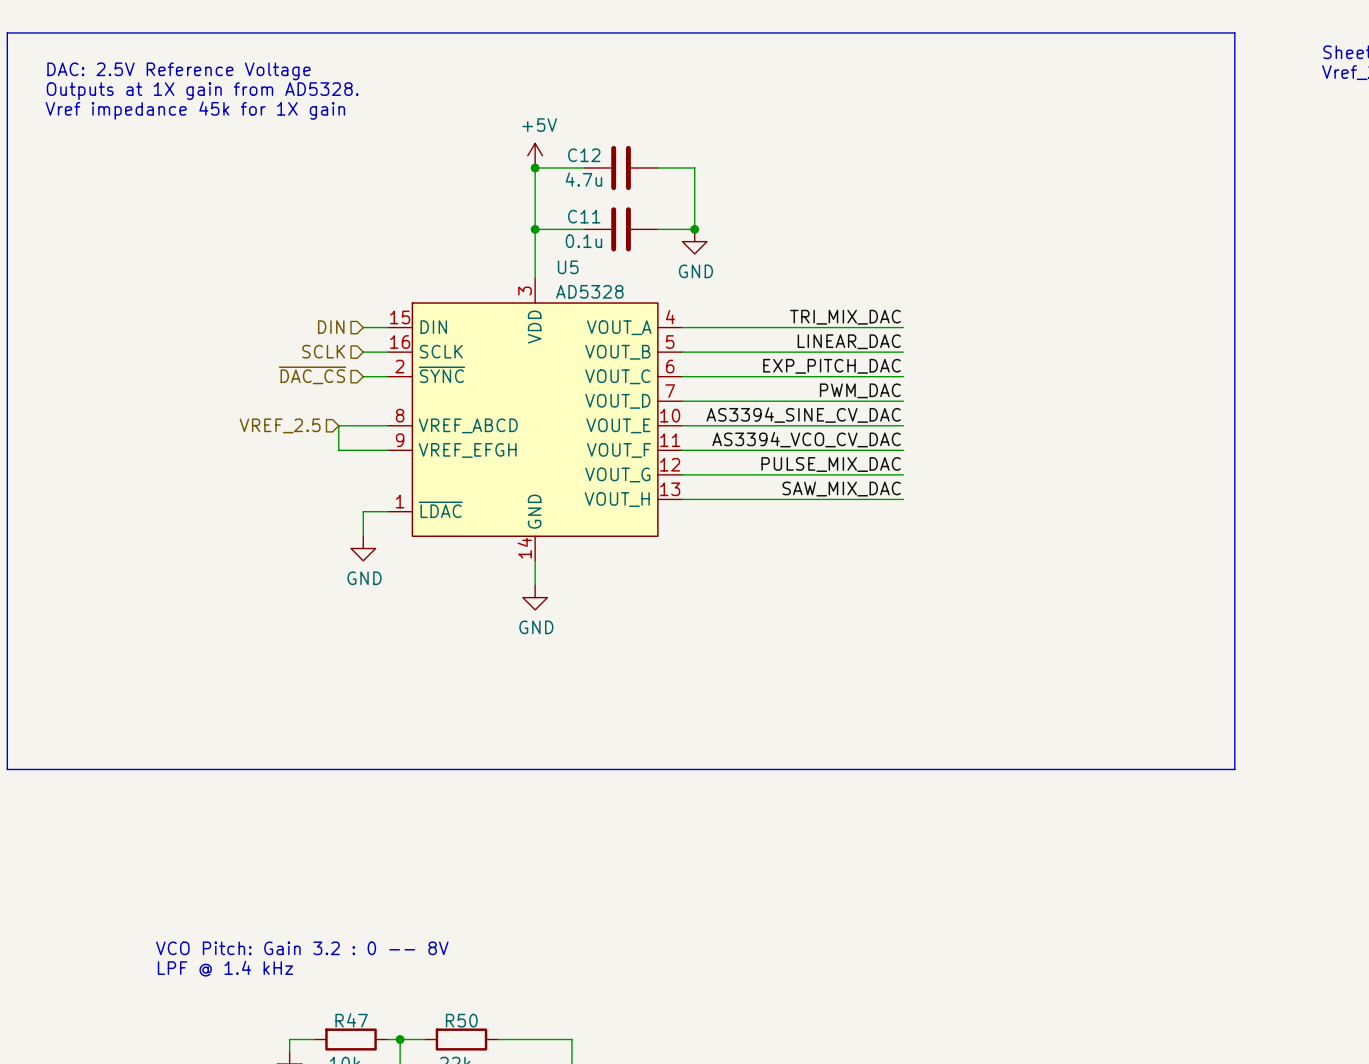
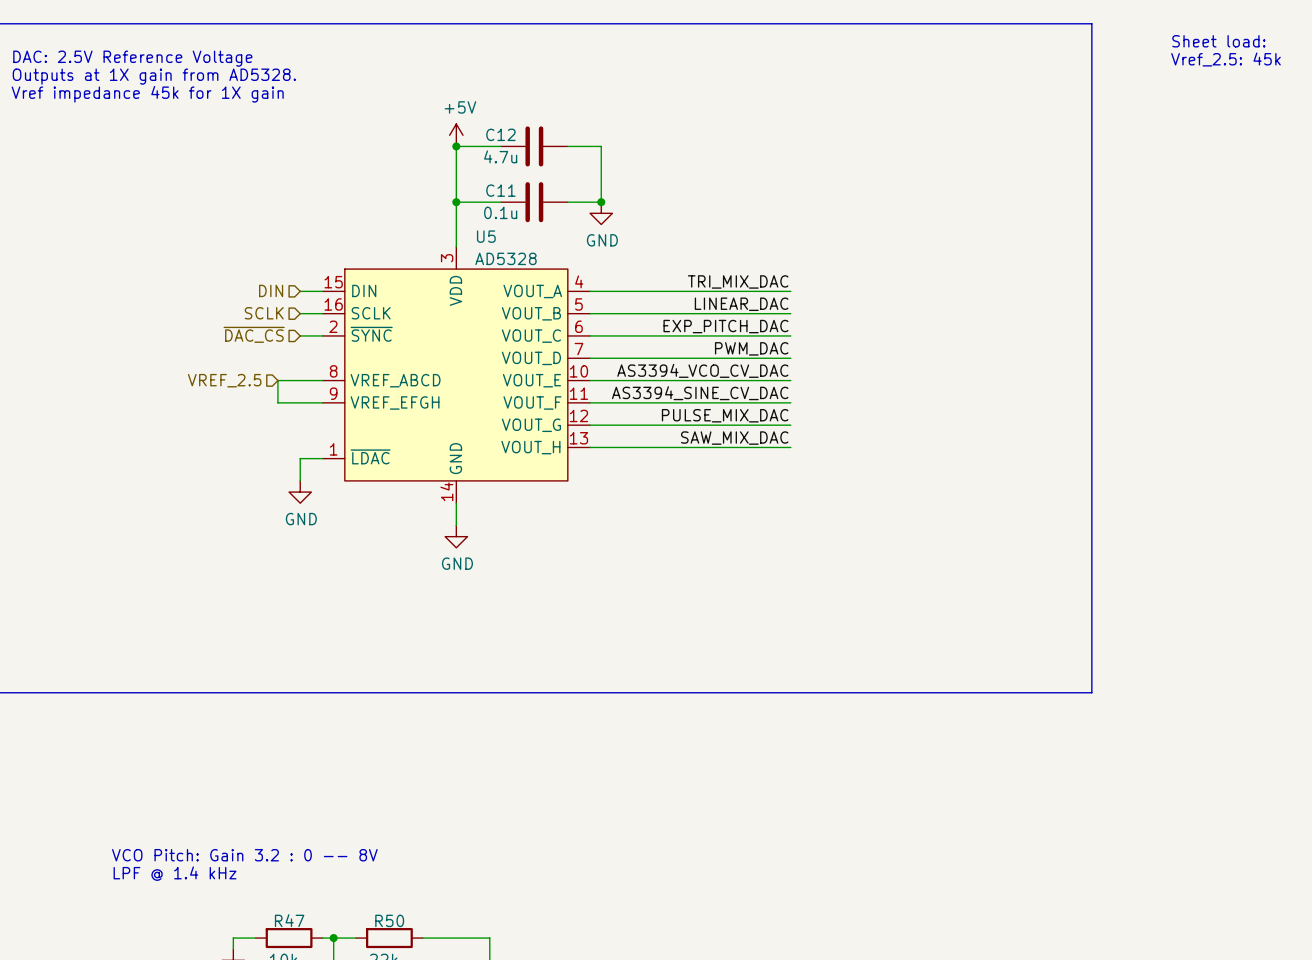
label: AS3394_SINE_CV_DAC (803, 415) -> AS3394_VCO_CV_DAC (702, 370)
label: AS3394_VCO_CV_DAC (806, 439) -> AS3394_SINE_CV_DAC (700, 393)

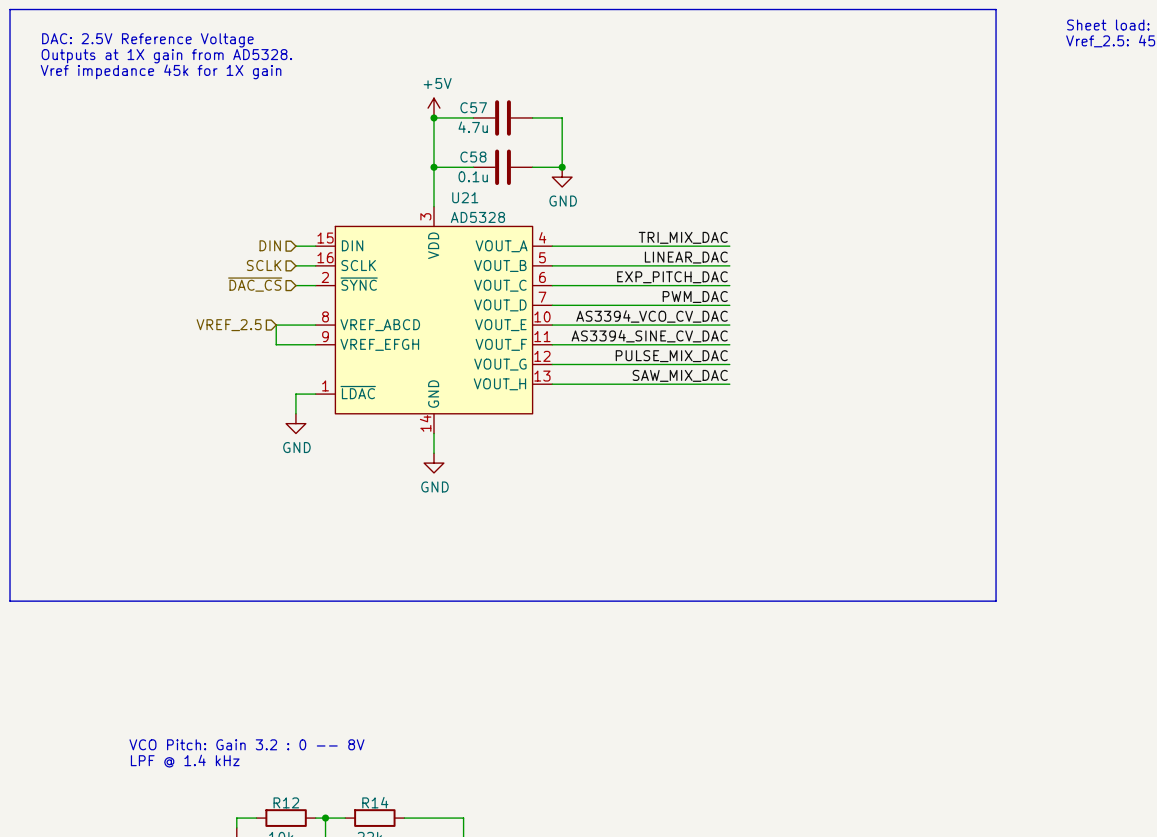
C12 name: C12 (500, 134) -> C57 (473, 107)
C11 name: C11 (500, 190) -> C58 (473, 157)
U5 name: U5 (486, 236) -> U21 (465, 197)
R47 name: R47 (289, 920) -> R12 (286, 802)
R50 name: R50 (389, 920) -> R14 (375, 802)

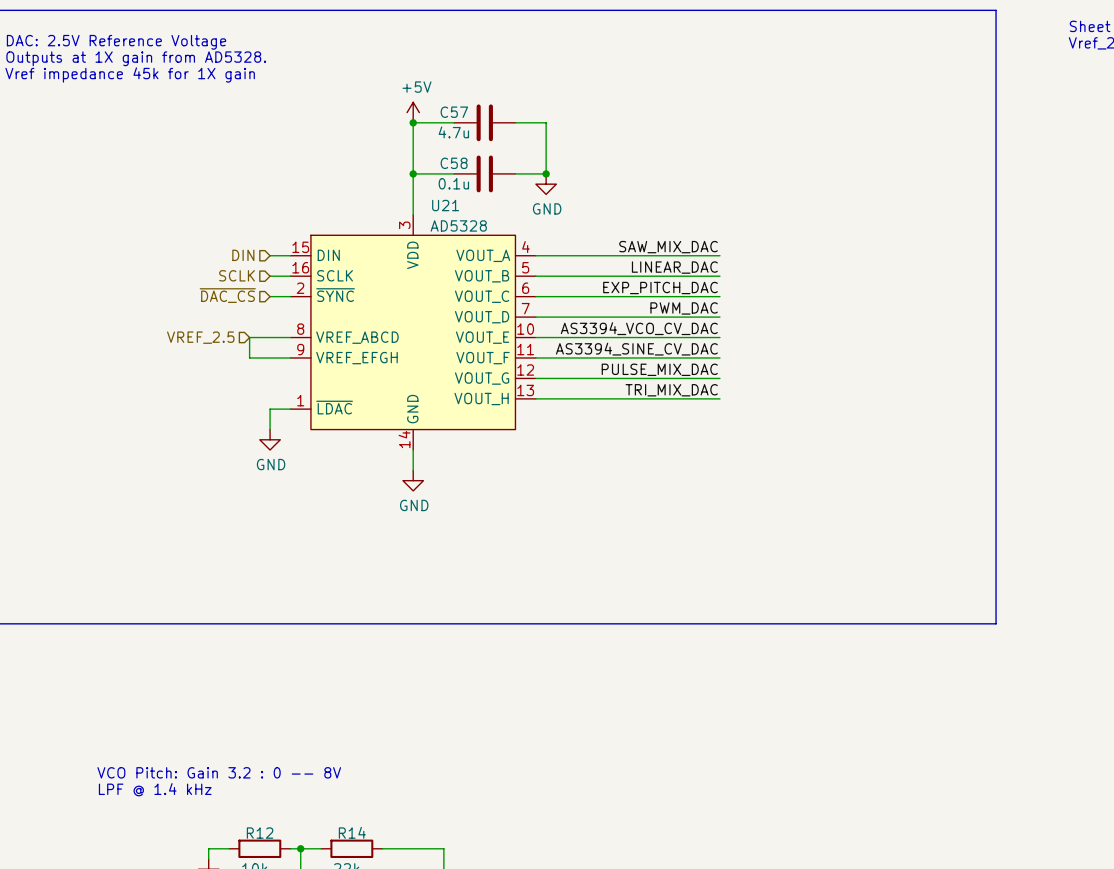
label: TRI_MIX_DAC (683, 237) -> SAW_MIX_DAC (668, 247)
label: SAW_MIX_DAC (680, 375) -> TRI_MIX_DAC (671, 390)

